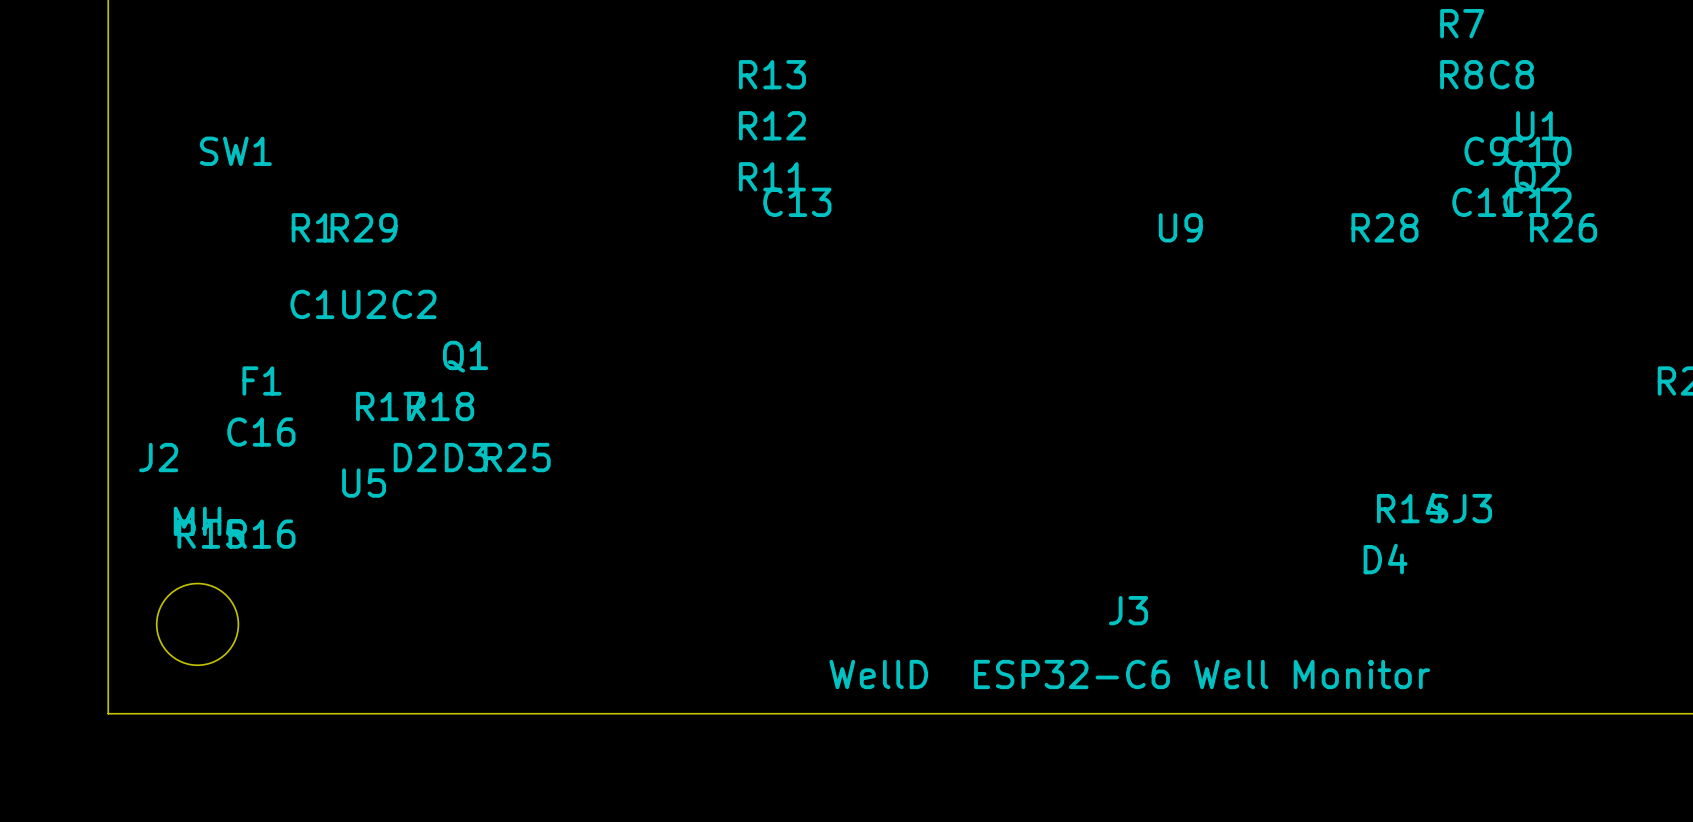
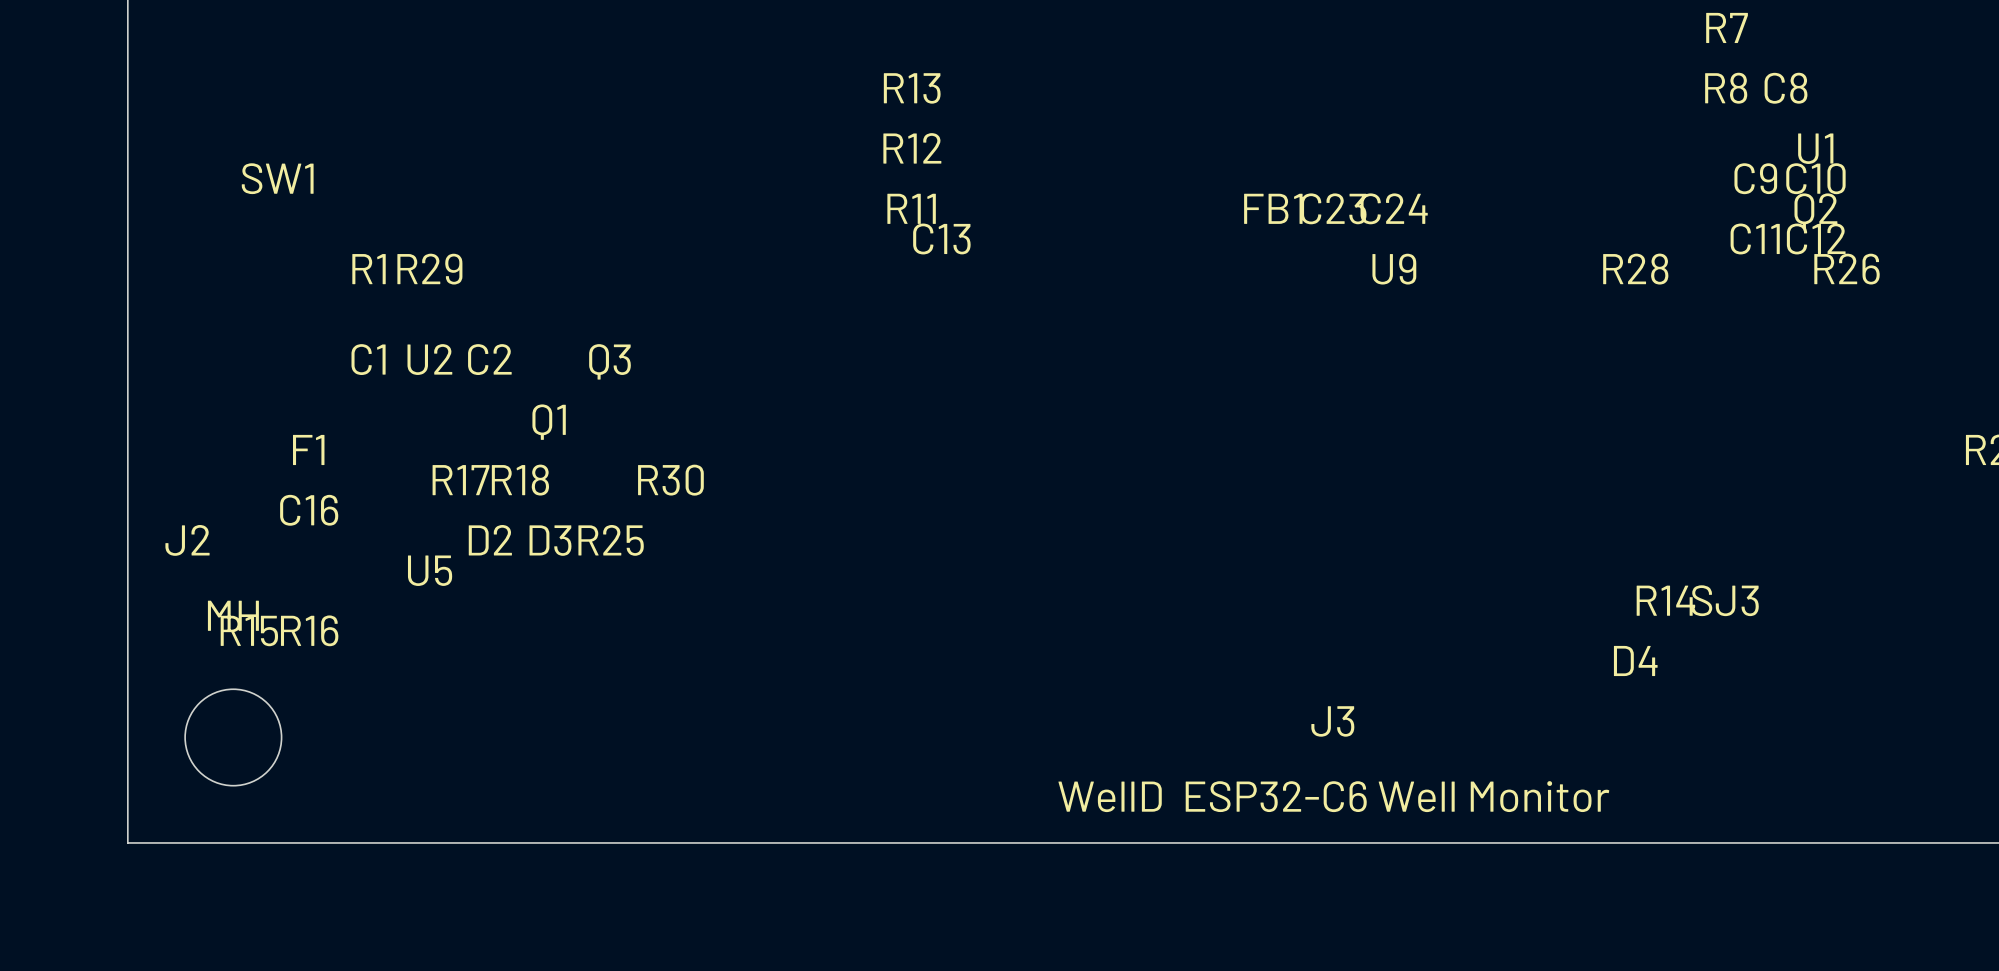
FB1: none -> (1273, 208)
C23: none -> (1333, 208)
C24: none -> (1394, 208)
Q3: none -> (610, 361)
R30: none -> (670, 480)

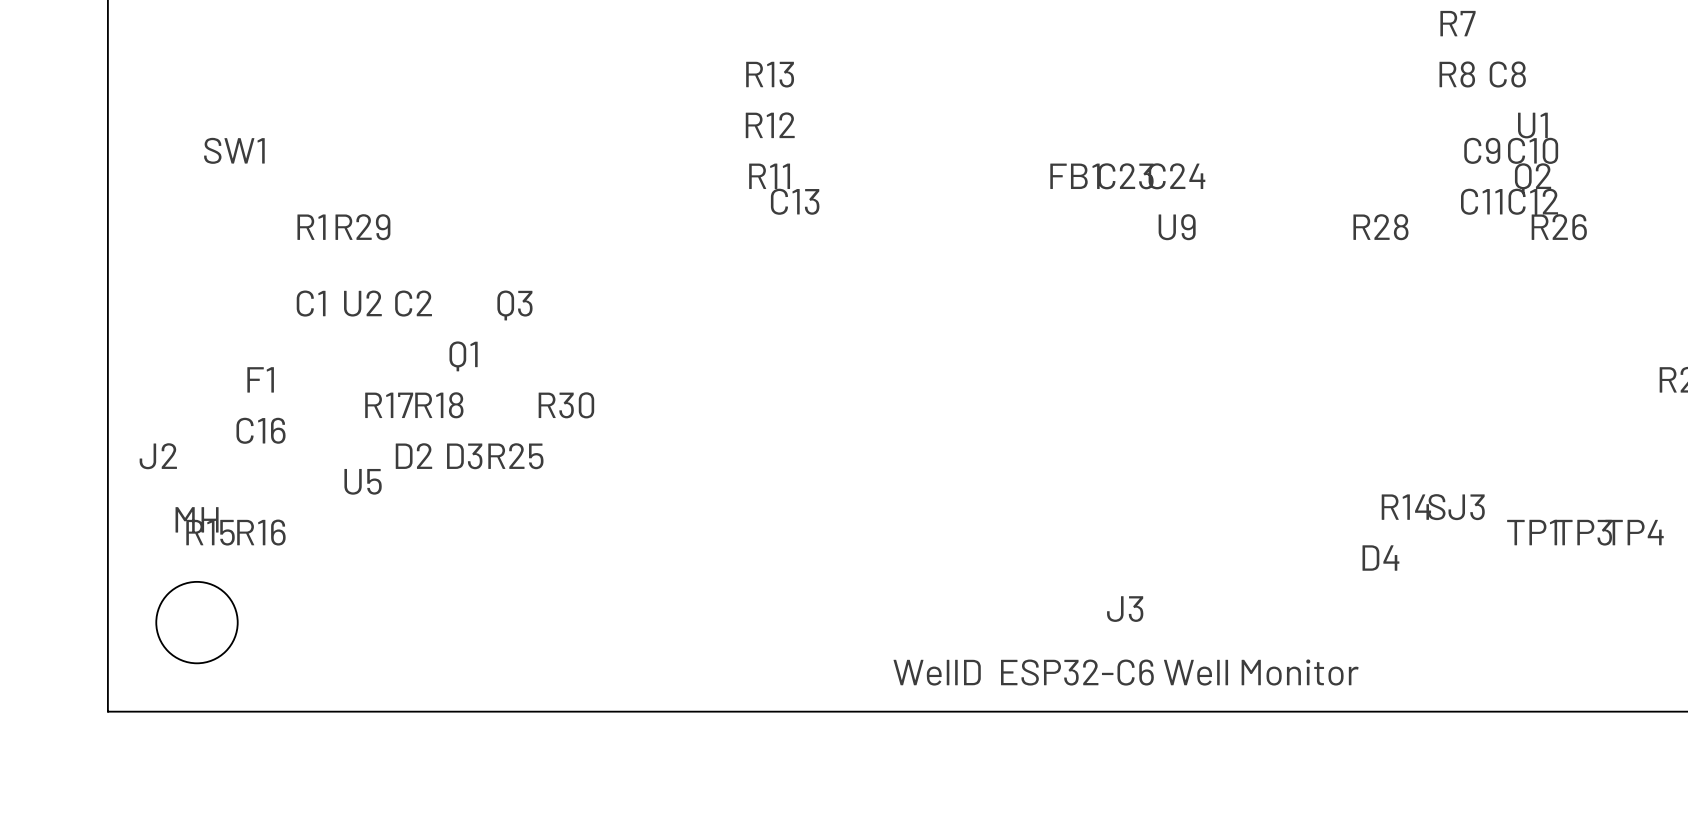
TP1: none -> (1532, 532)
TP3: none -> (1583, 532)
TP4: none -> (1634, 532)

